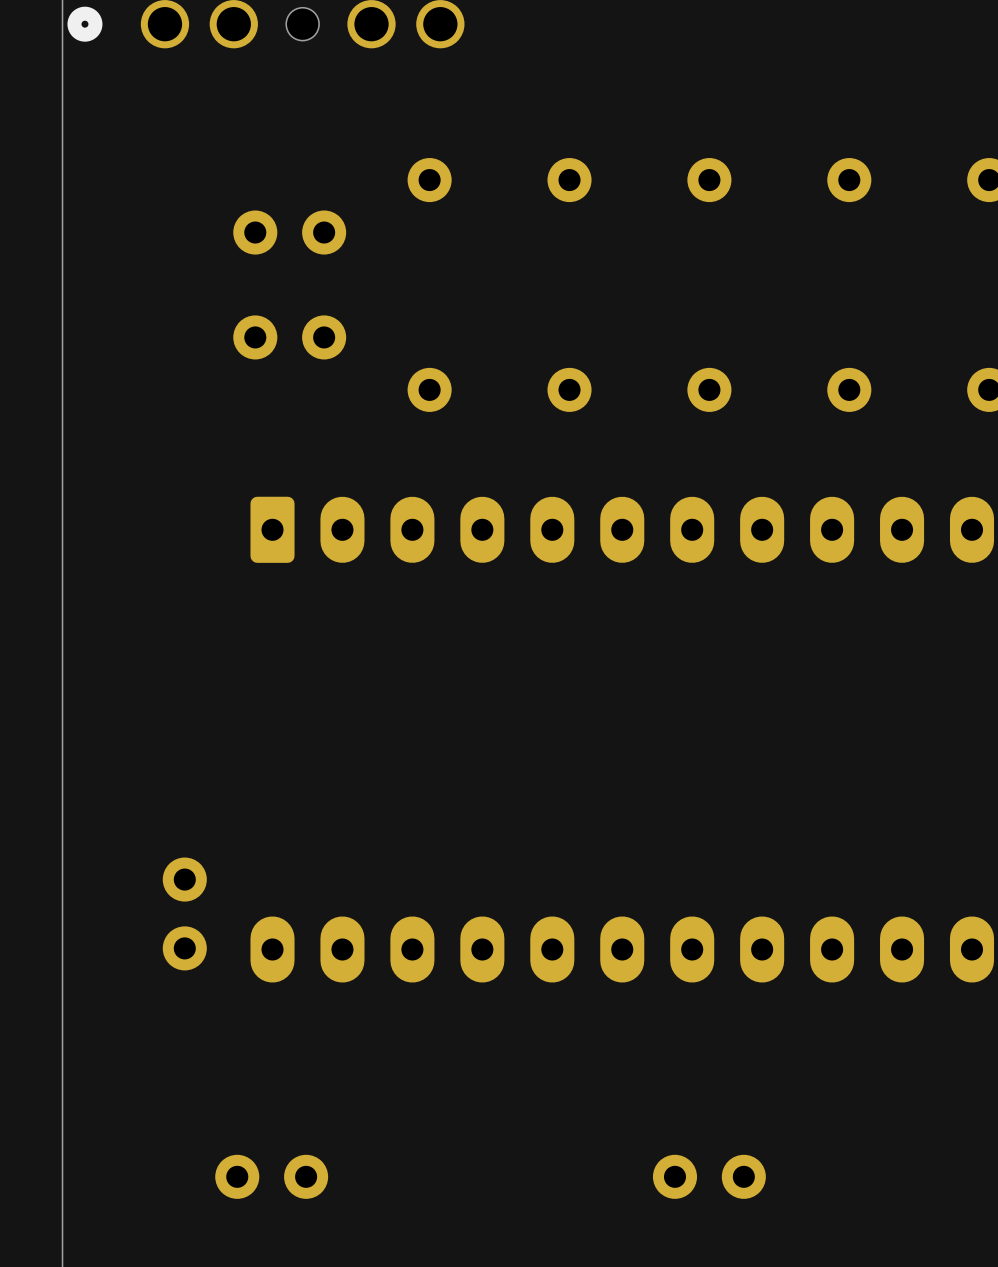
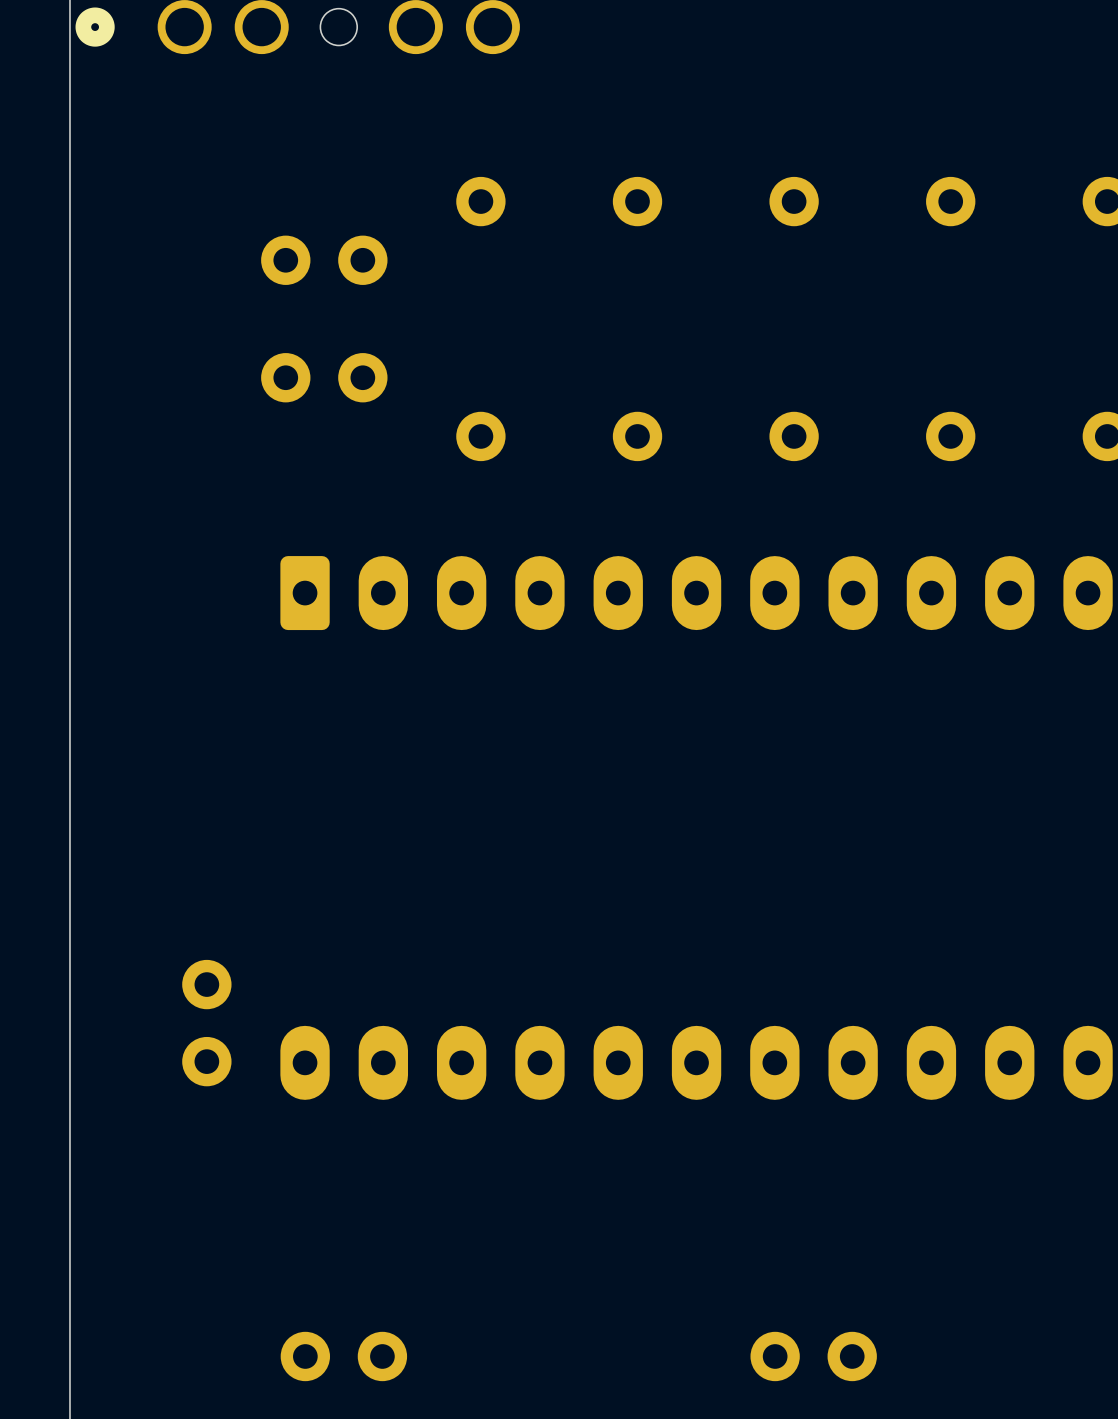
part position: (271, 1176) -> (343, 1356)
part position: (709, 1176) -> (813, 1356)

